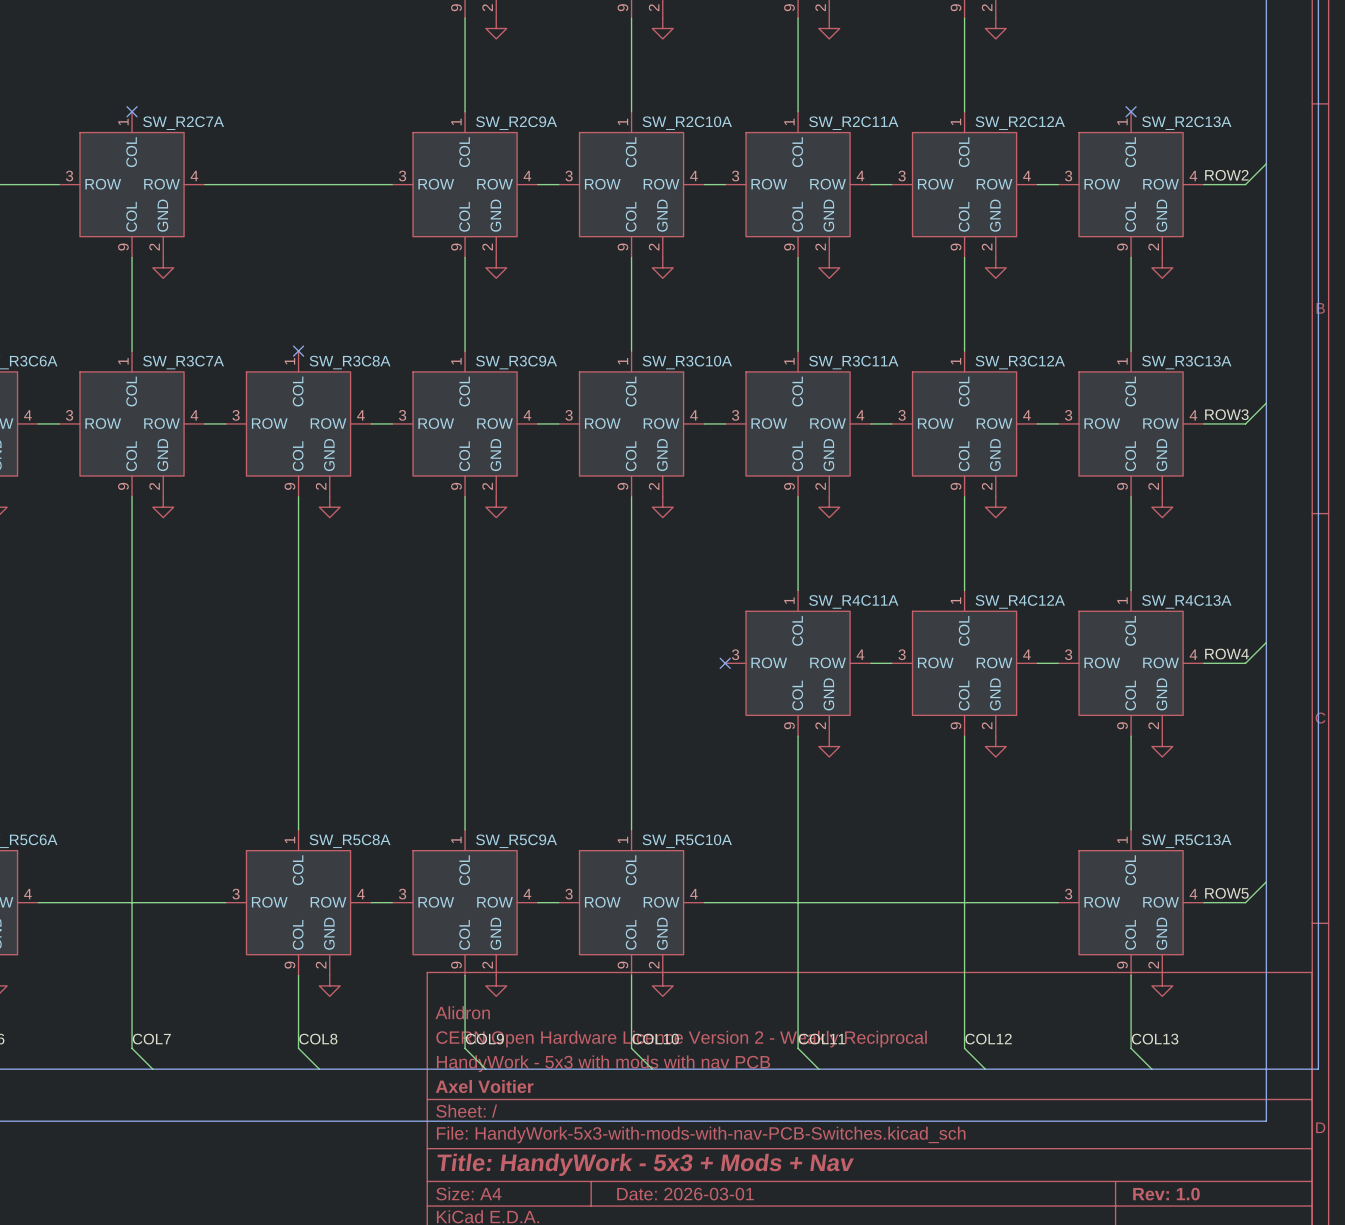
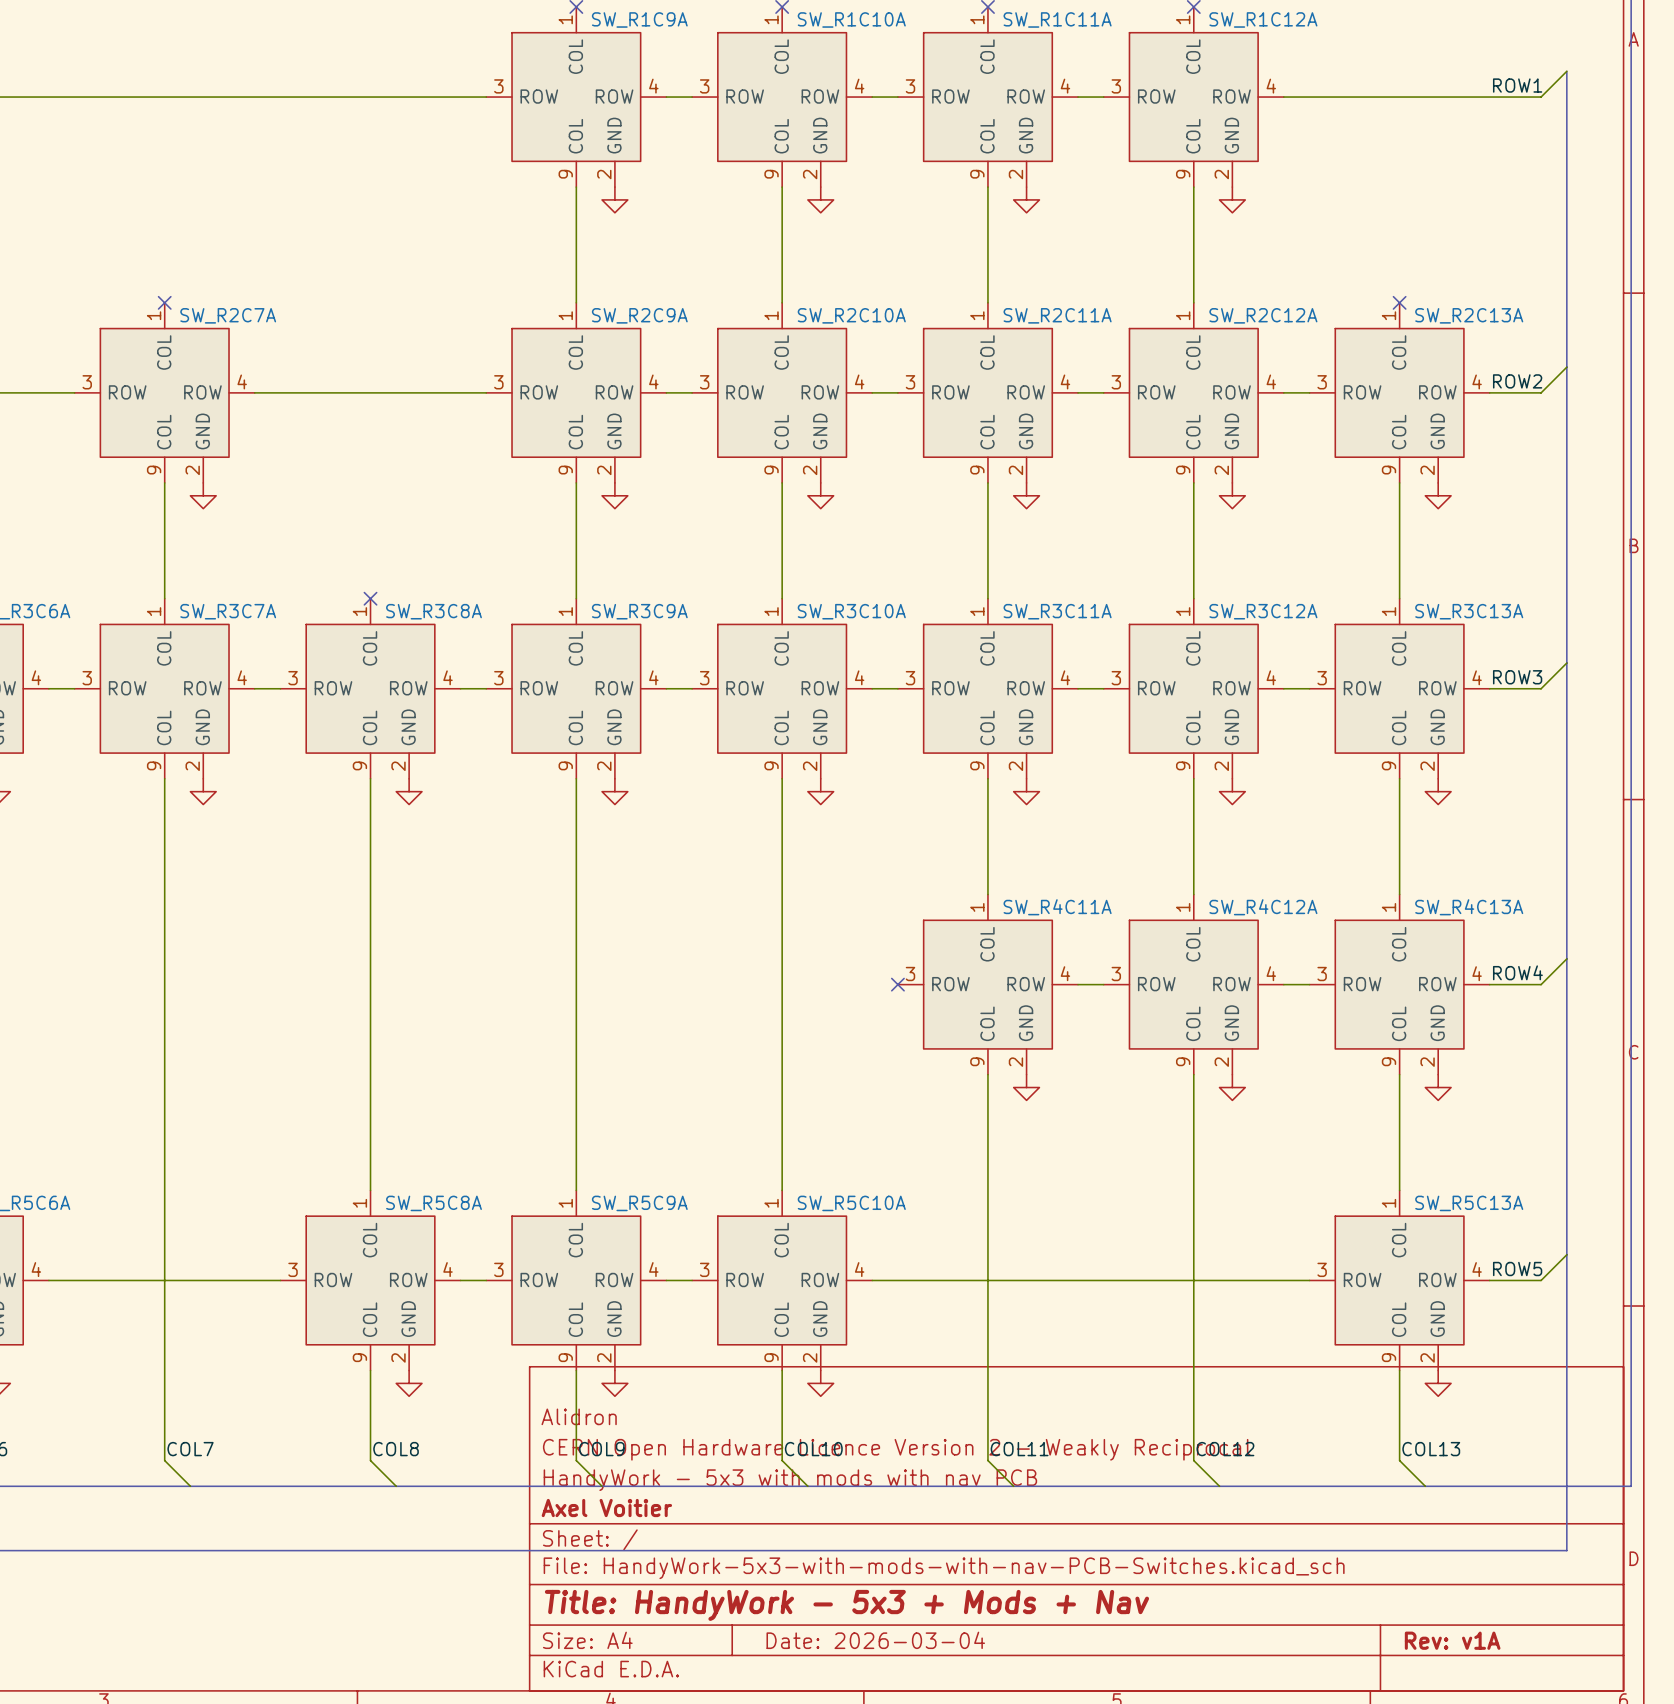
title block: Date: 2026-03-01 (685, 1194) -> Date: 2026-03-04 (875, 1640)
title block: Rev: 1.0 (1166, 1194) -> Rev: v1A (1452, 1640)

